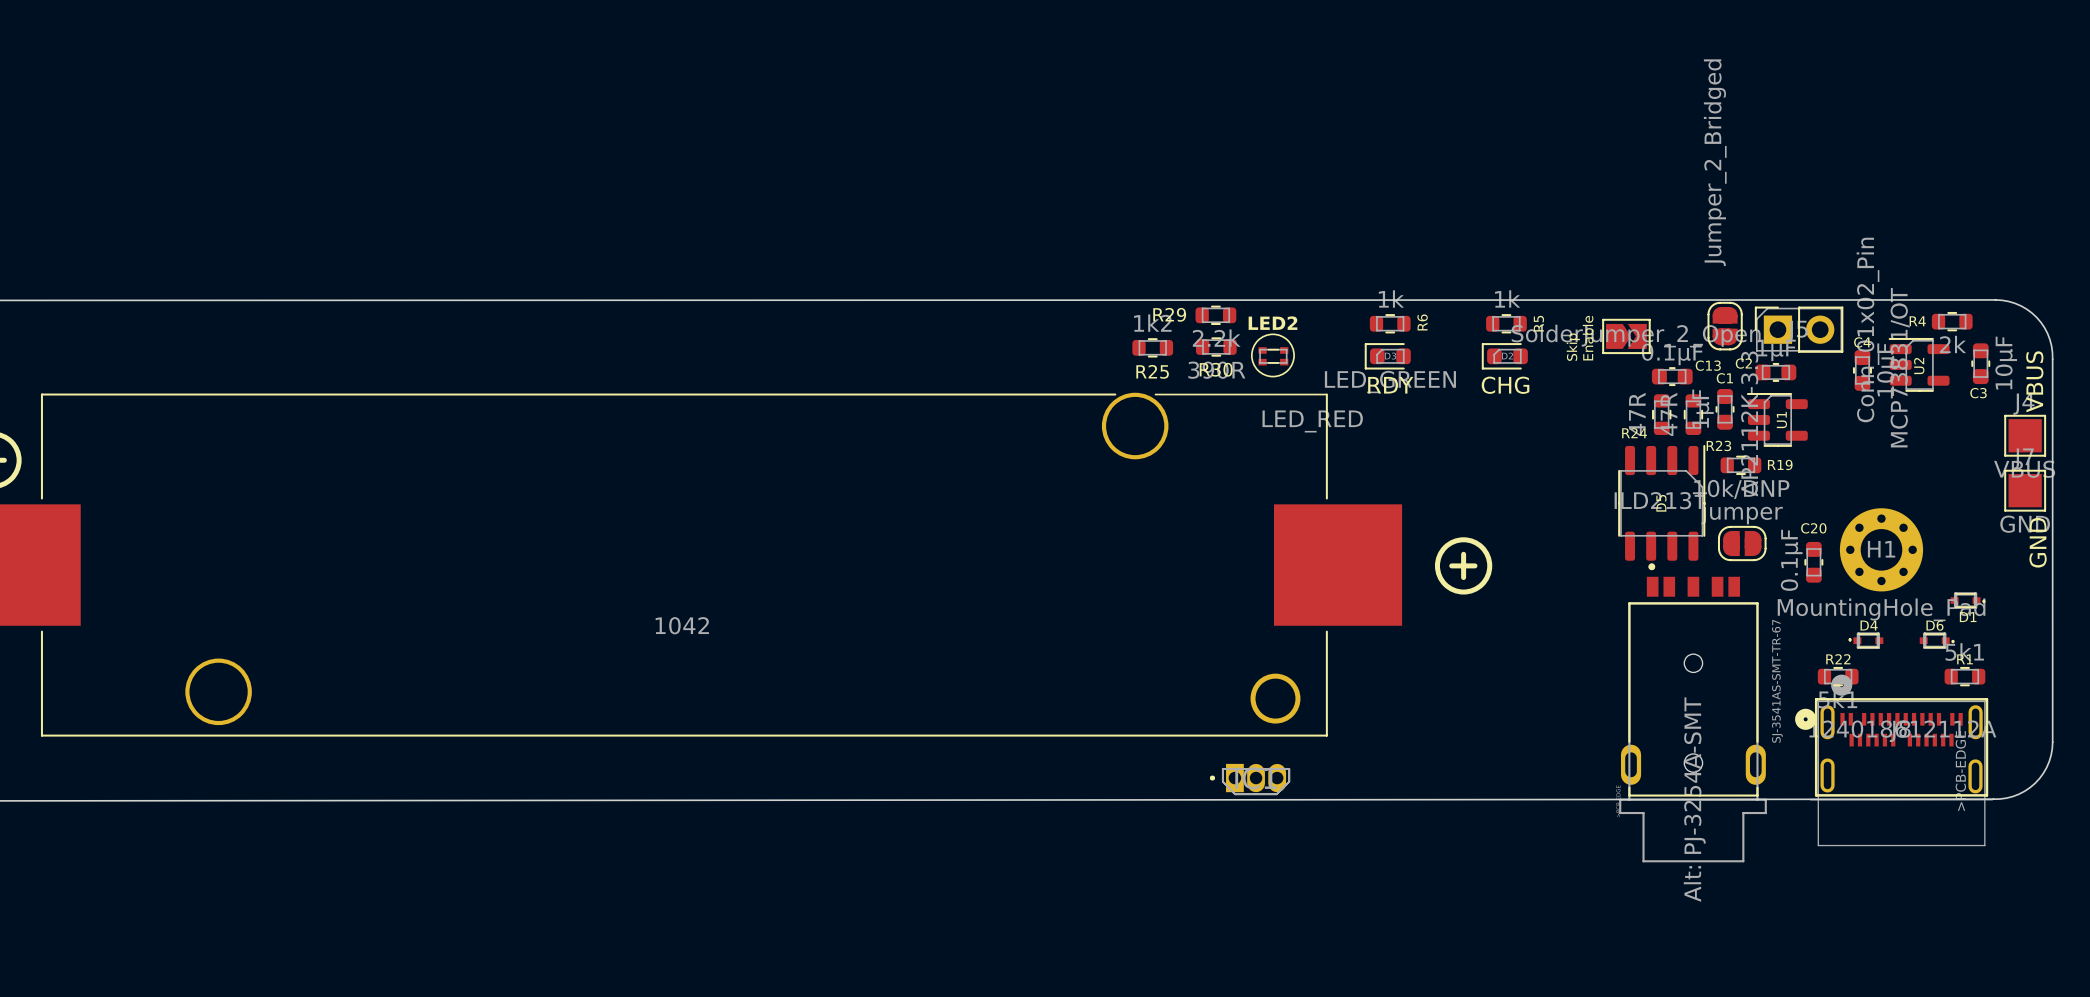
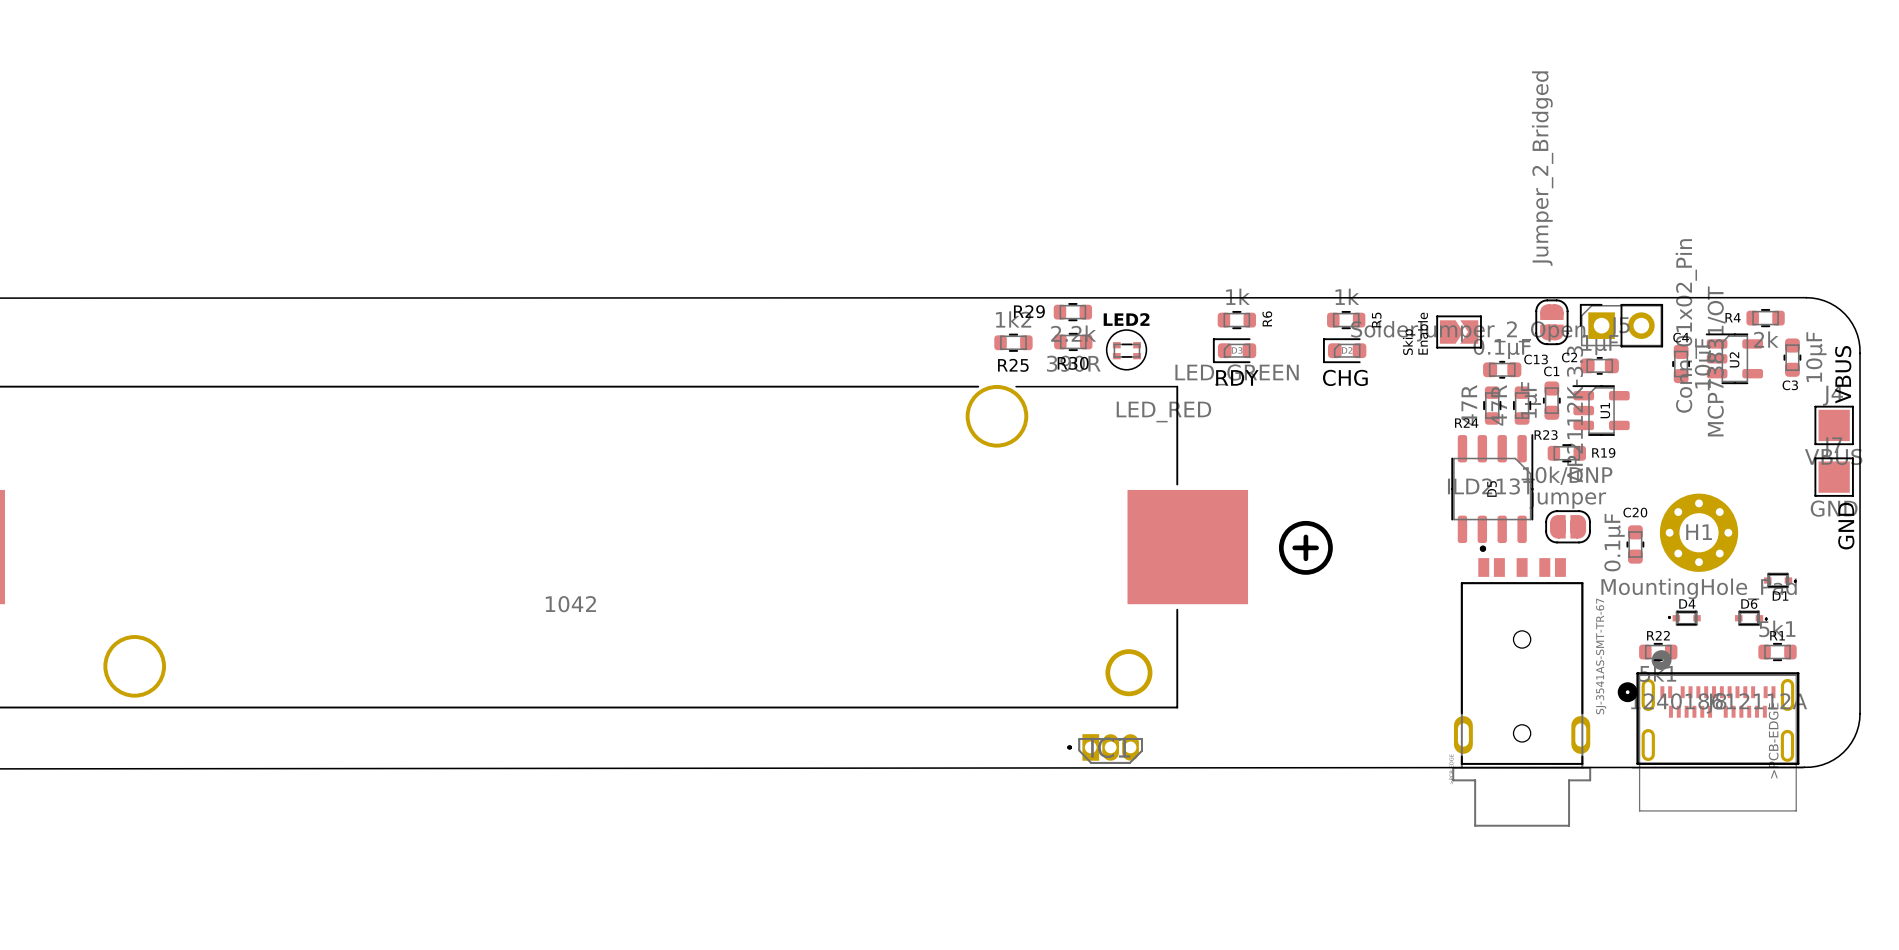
part text: Alt: PJ-3254A-SMT (1694, 799) -> none

